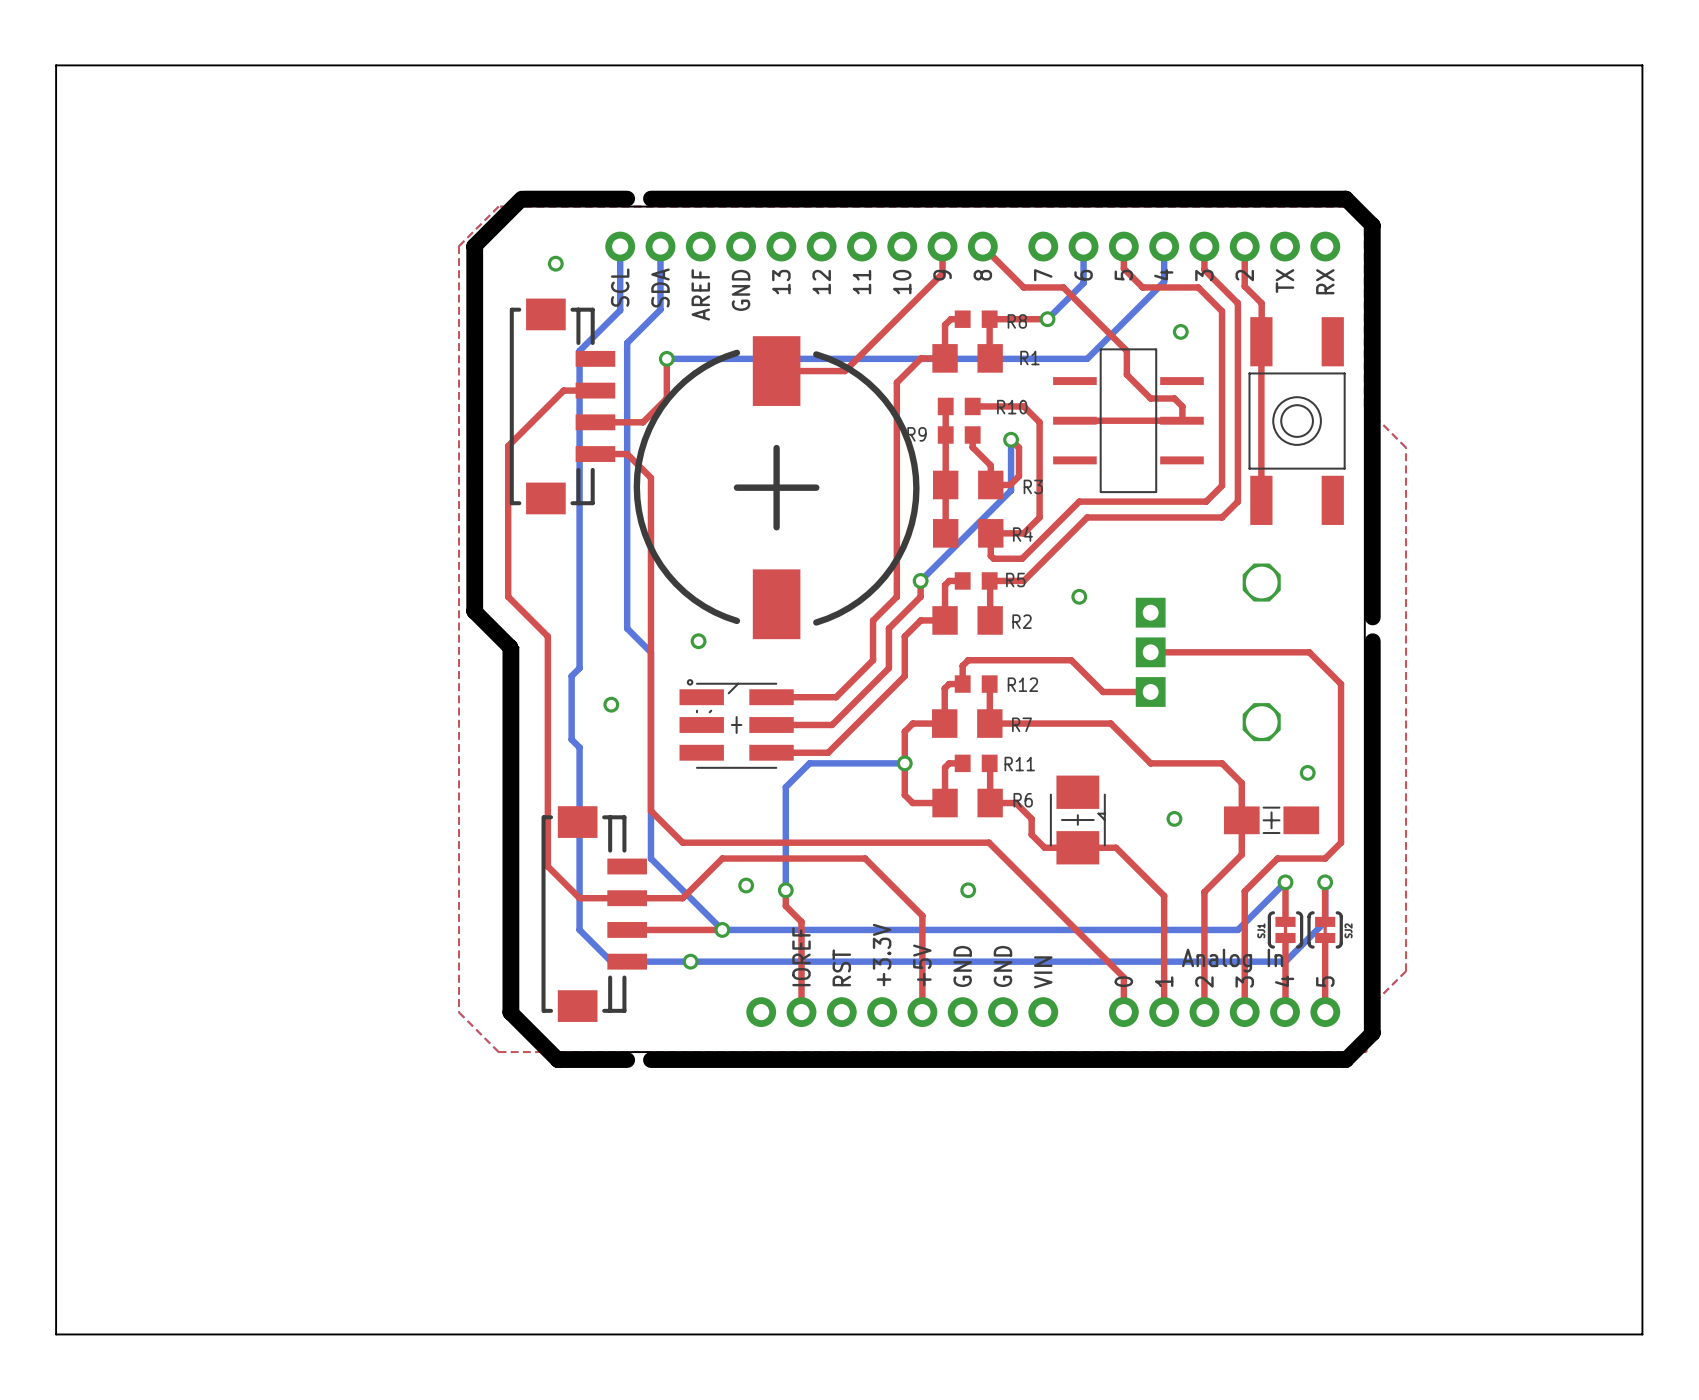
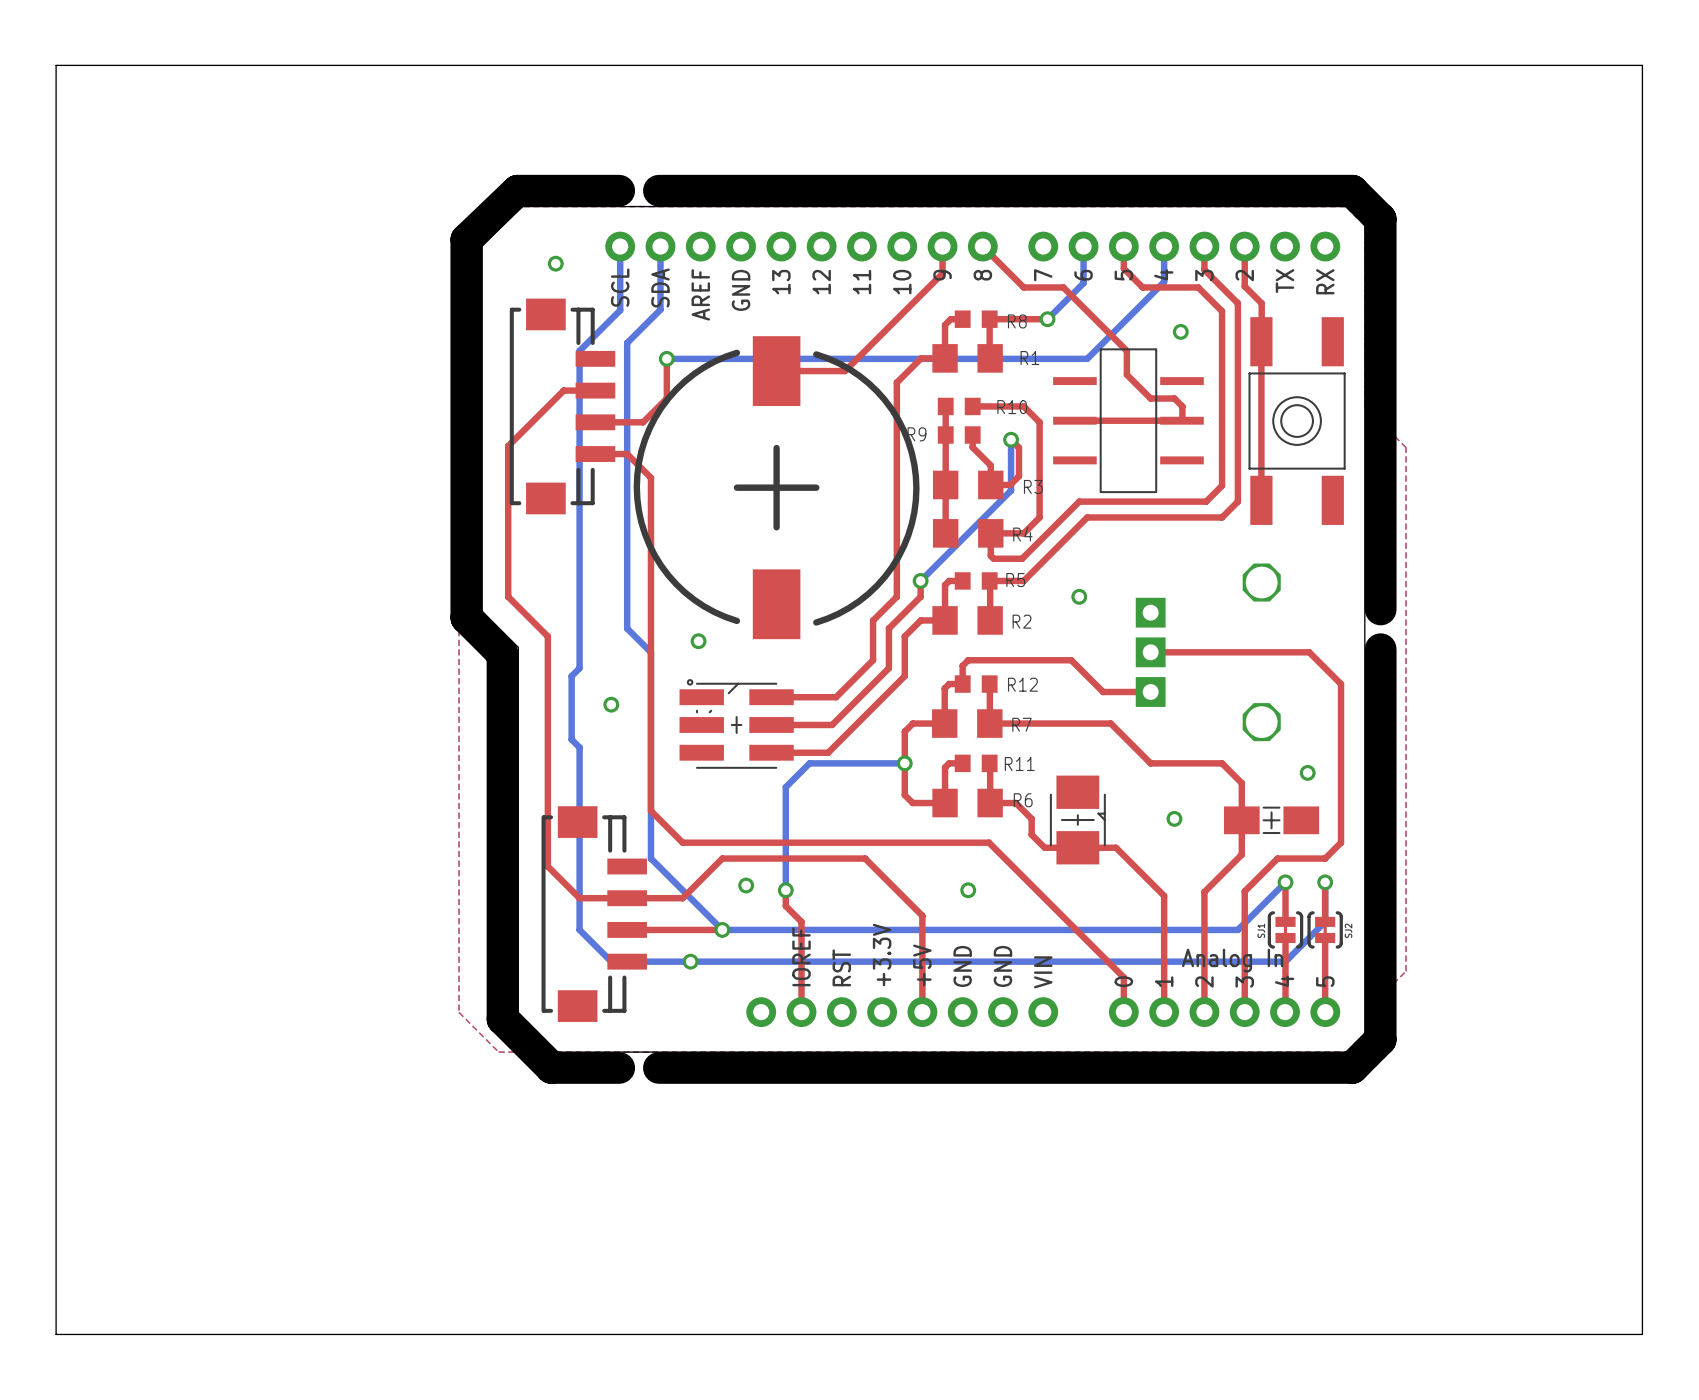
board edge: none -> (619, 190) (517, 190) (466, 239) (466, 617) (502, 654) (502, 1019) (551, 1067) (619, 1067)
board edge: none -> (658, 190) (1352, 190) (1380, 218) (1380, 609)
board edge: (521, 198) (474, 246) (474, 611) (510, 647) (510, 1012) (558, 1060) (627, 1060) -> none
board edge: (524, 198) (627, 198) -> none
board edge: (650, 198) (1345, 198) (1372, 225) (1372, 617) -> none
board edge: (1372, 641) (1372, 1033) (1345, 1060) (650, 1060) -> none
board edge: none -> (1380, 649) (1380, 1039) (1352, 1067) (658, 1067)

